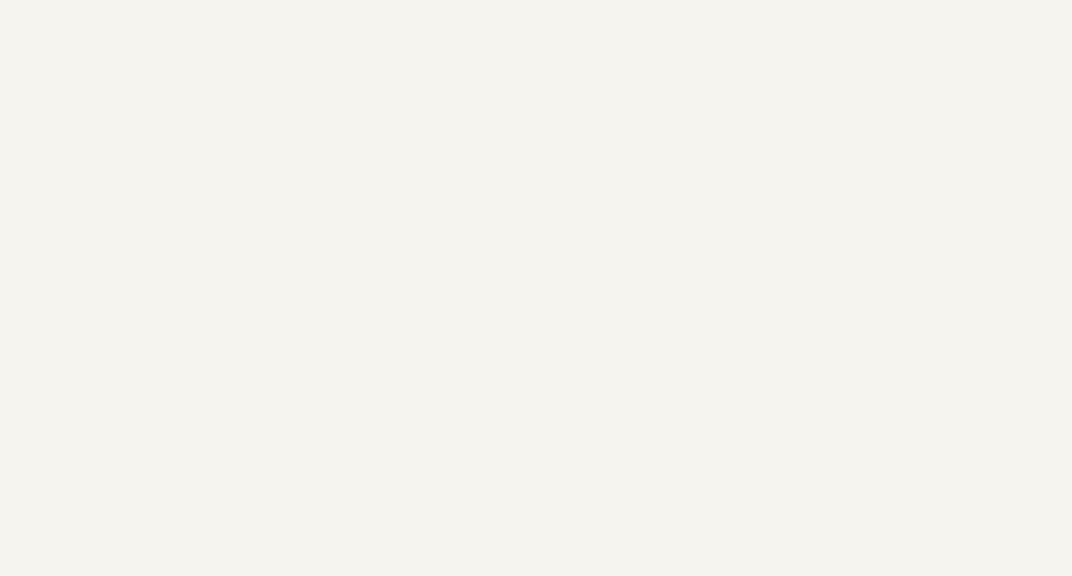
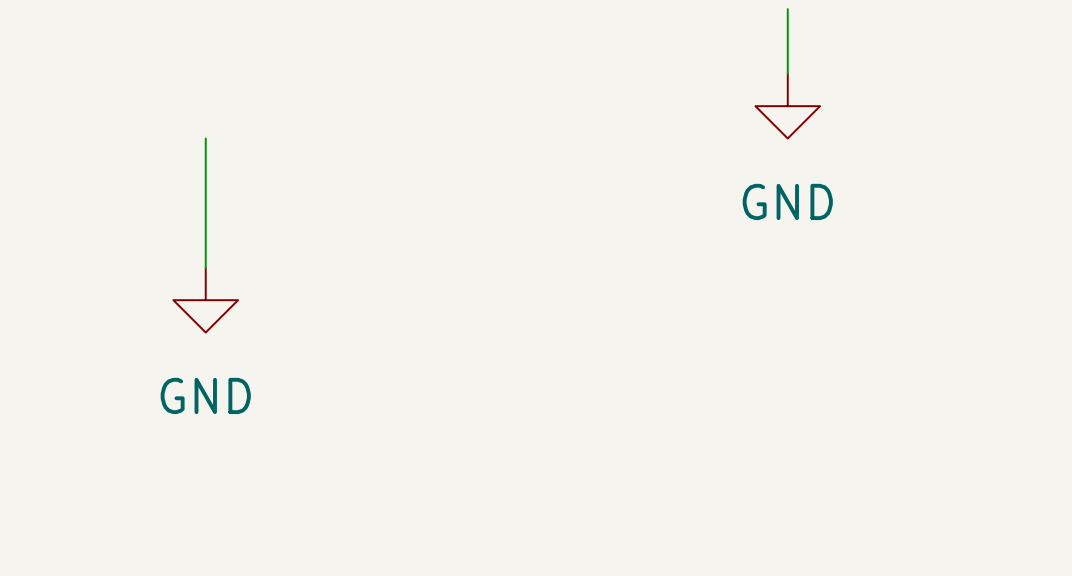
wire: none -> (787, 9) (787, 73)
power symbol: none -> GND (787, 106)
wire: none -> (205, 138) (205, 267)
power symbol: none -> GND (205, 300)

